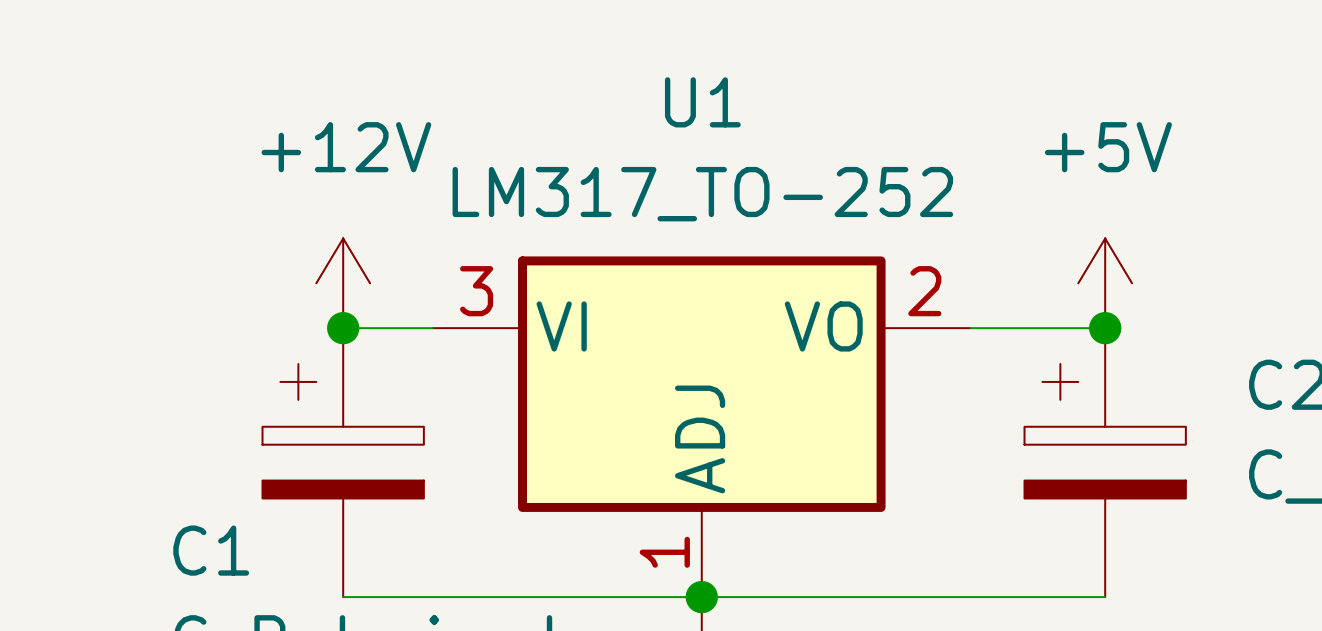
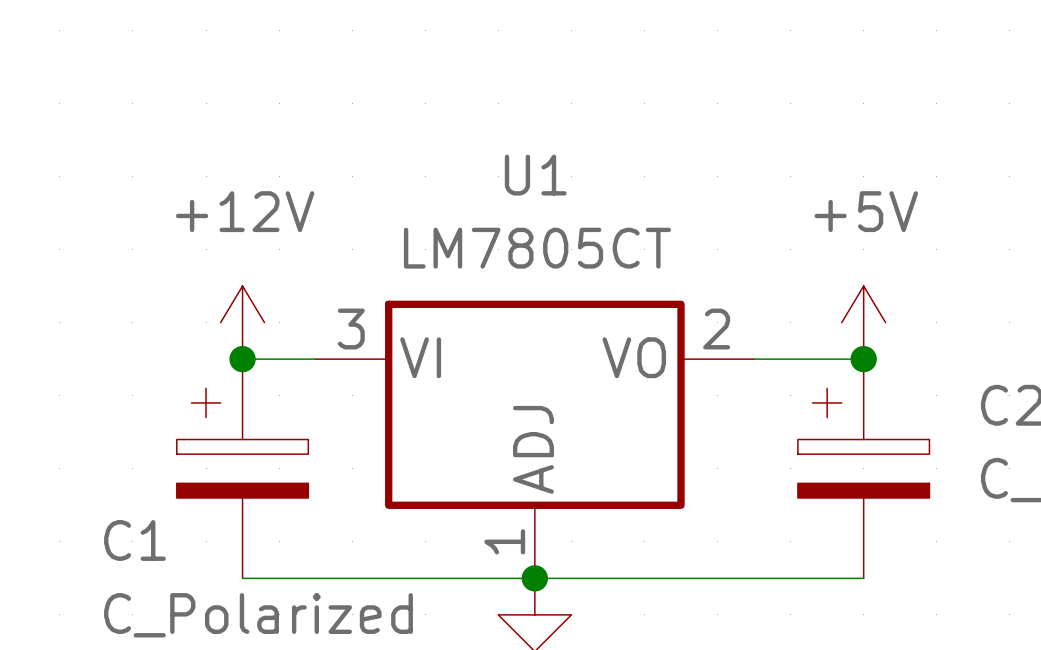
U1 value: LM317_TO-252 (702, 194) -> LM7805CT (537, 248)

